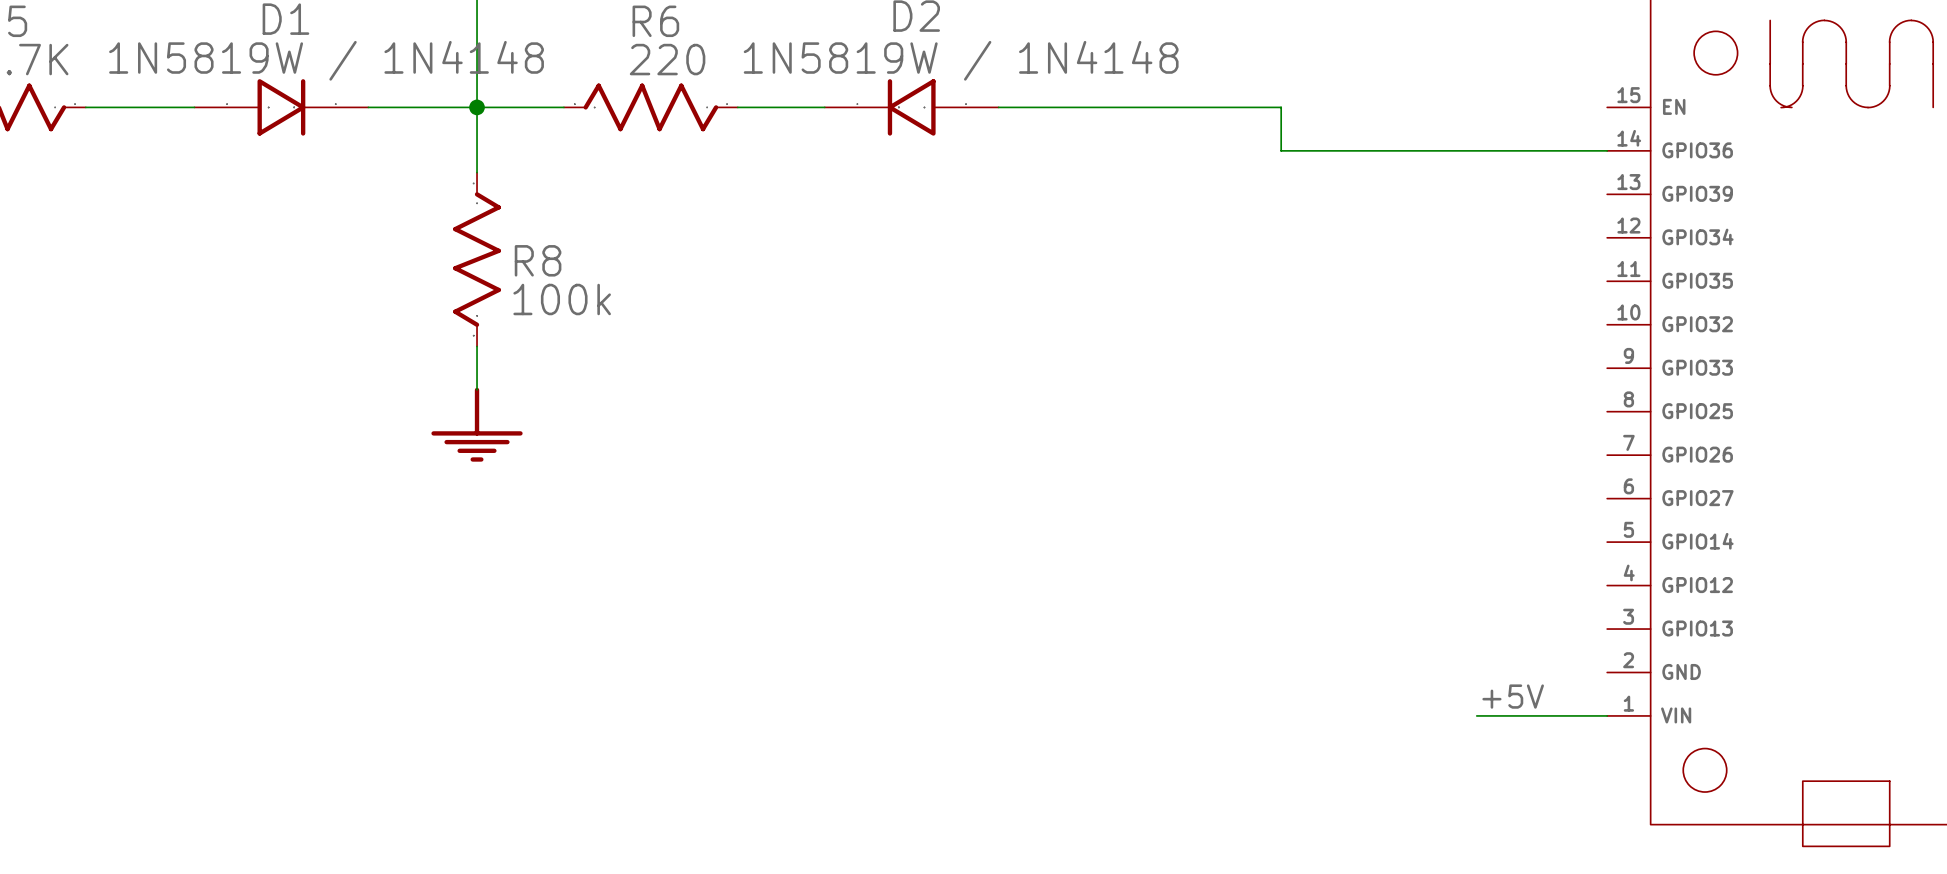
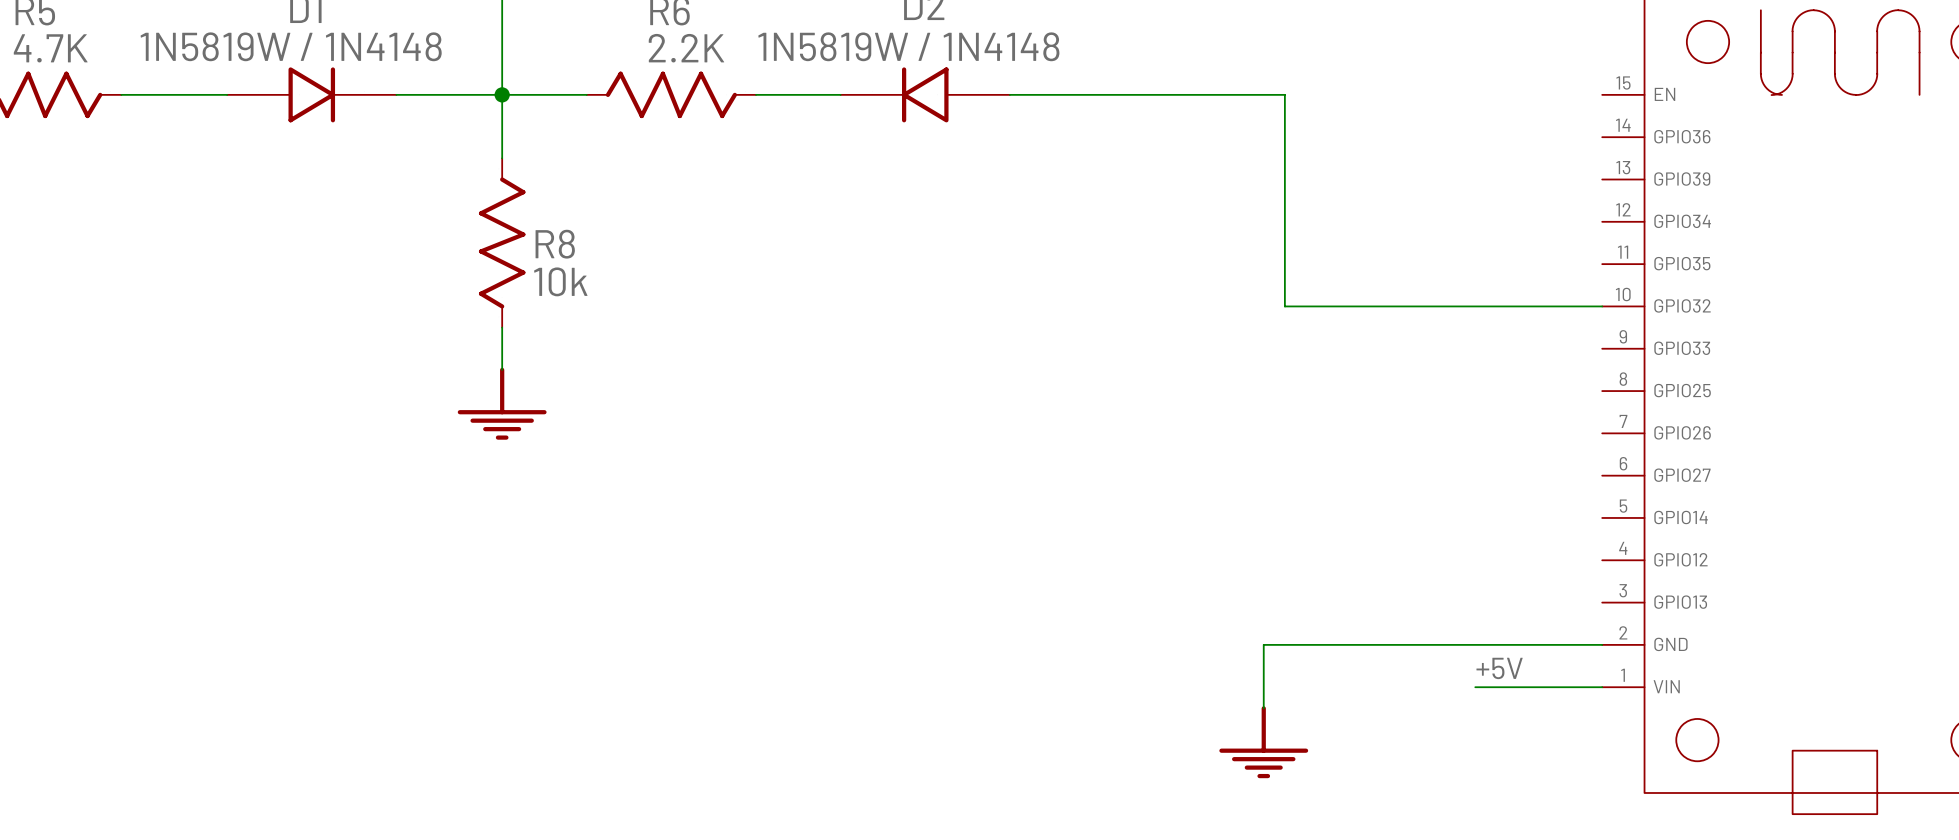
R6 value: 220 (667, 59) -> 2.2K (686, 48)
wire: (1281, 150) (1607, 150) -> (1284, 137) (1284, 306) (1602, 306)
R8 value: 100k (562, 299) -> 10k (560, 281)
wire: none -> (1602, 644) (1263, 644) (1263, 708)
power symbol: none -> (1263, 742)

